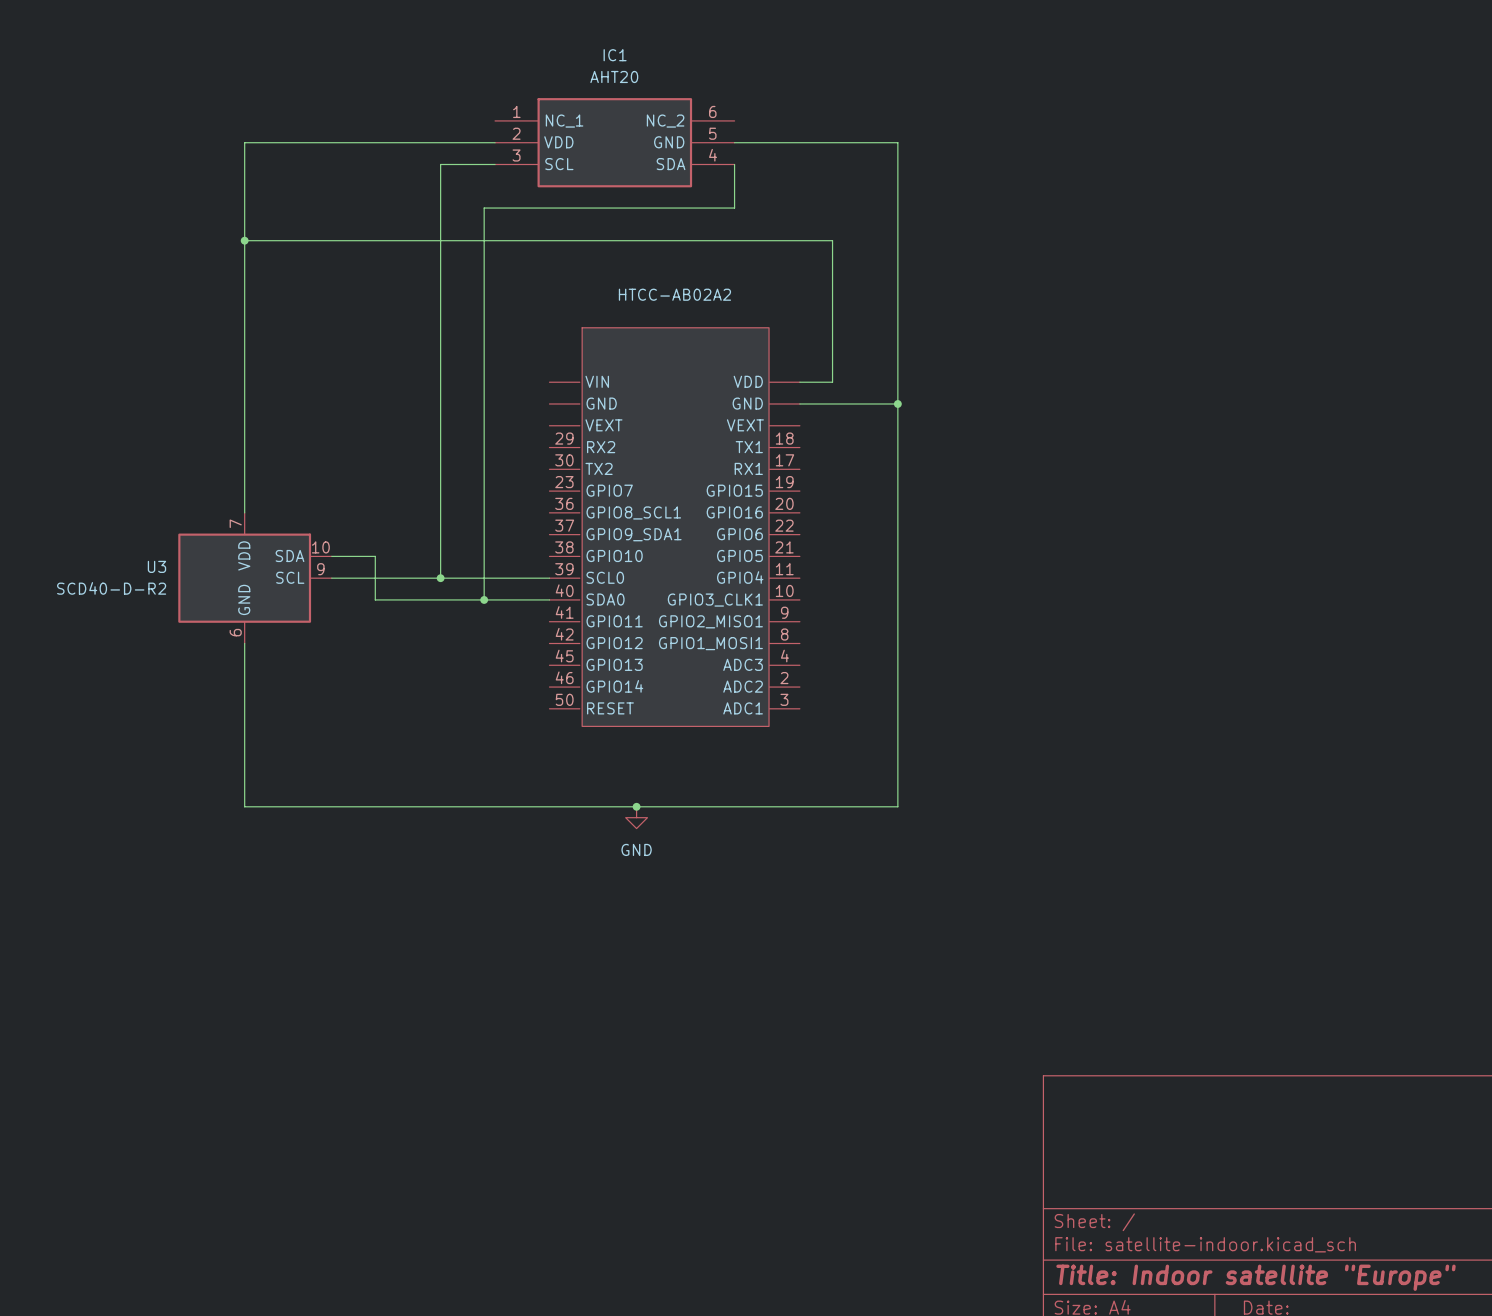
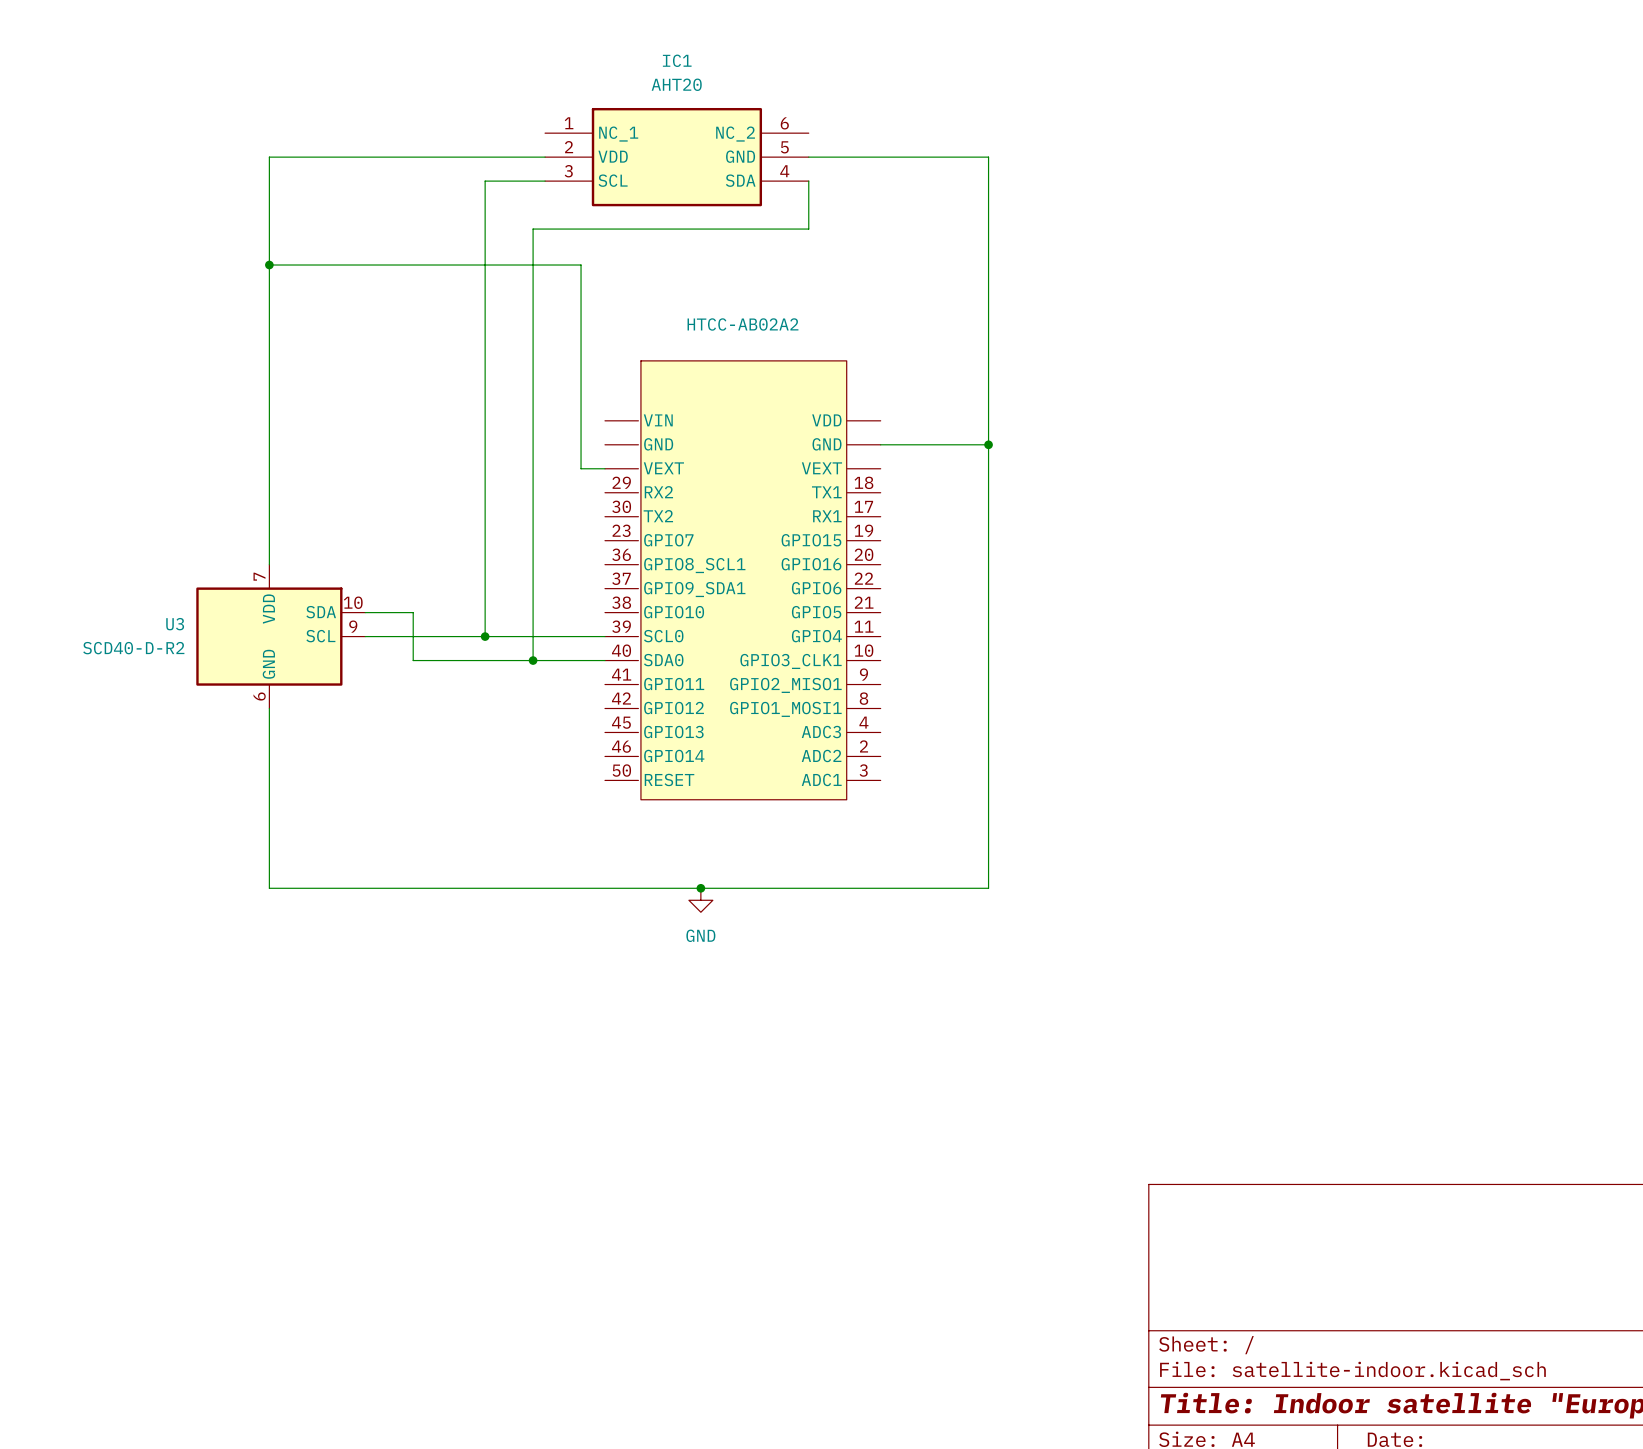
wire: (527, 240) (832, 240) (832, 382) (799, 382) -> (581, 265) (581, 468) (604, 468)

